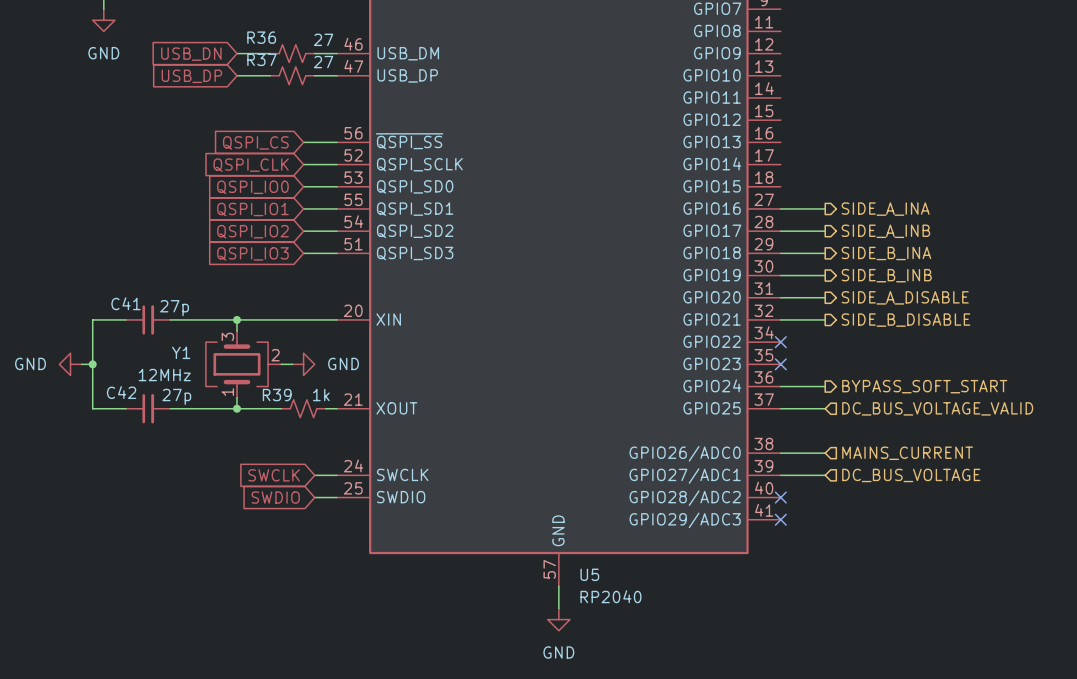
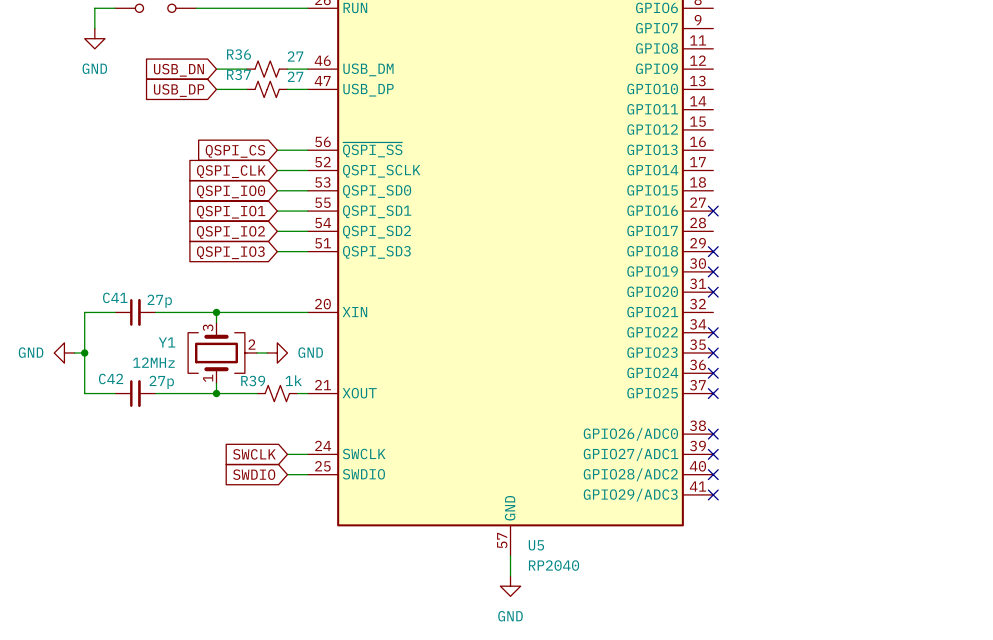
wire: (780, 208) (825, 208) -> none
no-connect mark: none -> (713, 211)
hierarchical label: SIDE_A_INA (885, 209) -> none
wire: (780, 231) (825, 231) -> none
hierarchical label: SIDE_A_INB (885, 231) -> none
wire: (780, 253) (825, 253) -> none
no-connect mark: none -> (713, 251)
hierarchical label: SIDE_B_INA (886, 253) -> none
wire: (780, 275) (825, 275) -> none
no-connect mark: none -> (713, 271)
hierarchical label: SIDE_B_INB (886, 275) -> none
wire: (780, 297) (825, 297) -> none
no-connect mark: none -> (713, 292)
hierarchical label: SIDE_A_DISABLE (905, 297) -> none
wire: (780, 319) (825, 319) -> none
hierarchical label: SIDE_B_DISABLE (905, 320) -> none
wire: (780, 386) (825, 386) -> none
no-connect mark: none -> (713, 373)
hierarchical label: BYPASS_SOFT_START (924, 386) -> none
wire: (780, 408) (825, 408) -> none
no-connect mark: none -> (713, 393)
hierarchical label: DC_BUS_VOLTAGE_VALID (937, 408) -> none
wire: (780, 453) (825, 453) -> none
no-connect mark: none -> (713, 434)
hierarchical label: MAINS_CURRENT (907, 453) -> none
wire: (780, 475) (825, 475) -> none
no-connect mark: none -> (713, 454)
hierarchical label: DC_BUS_VOLTAGE (911, 475) -> none

